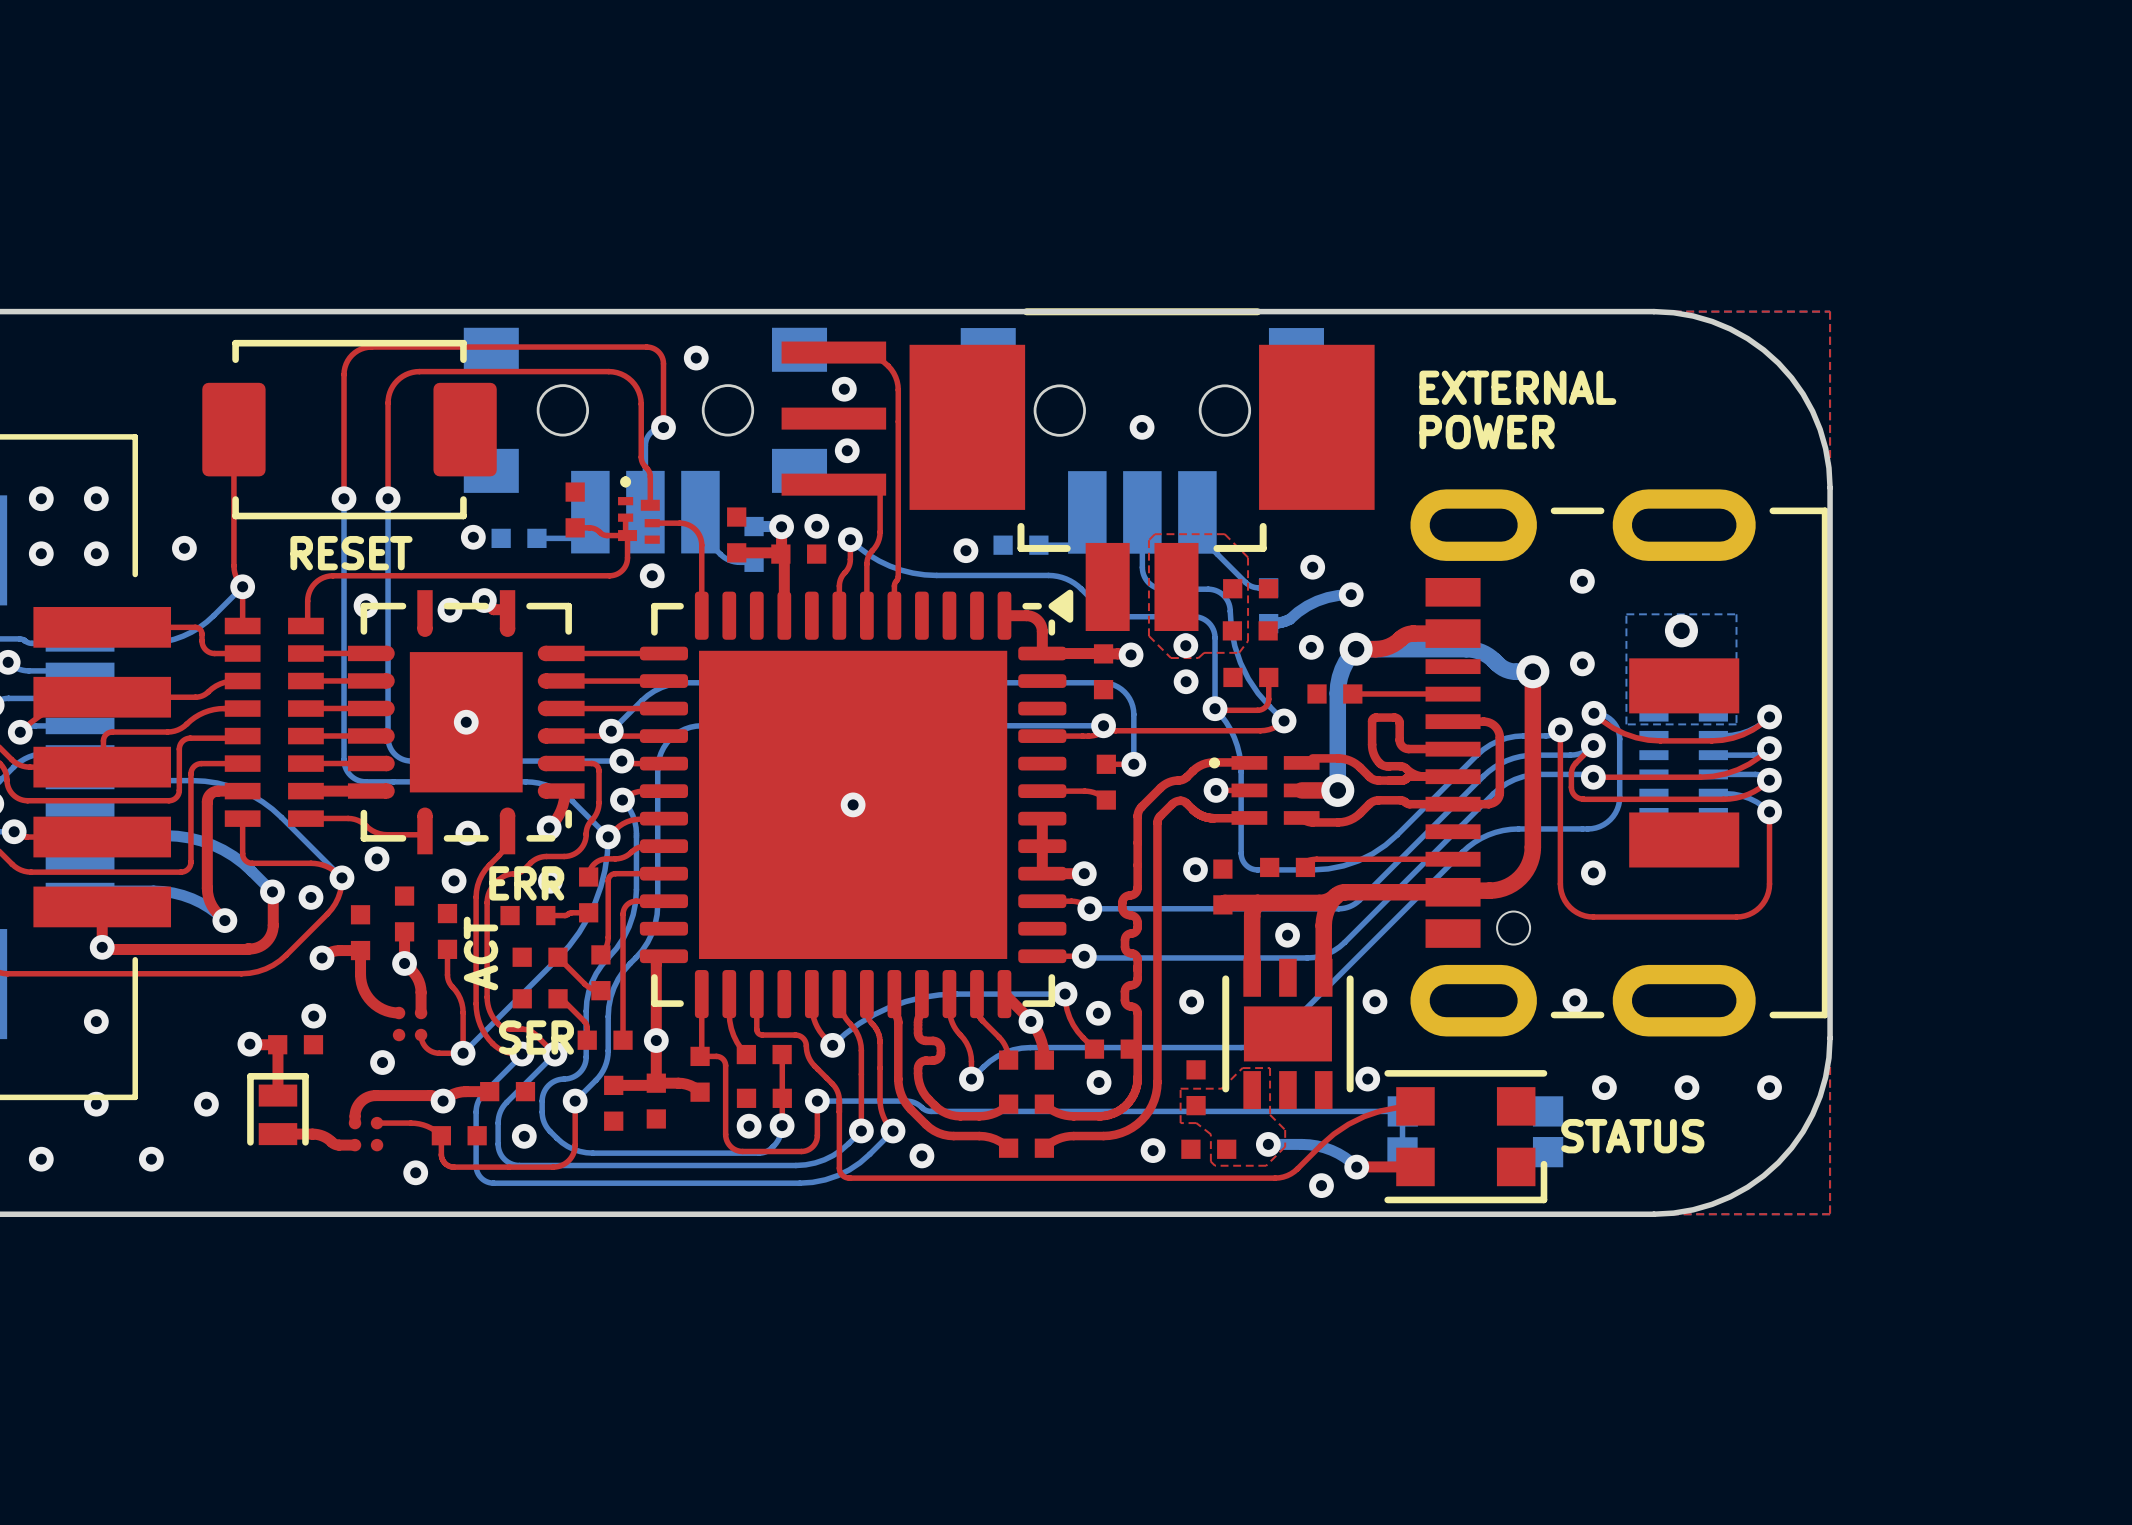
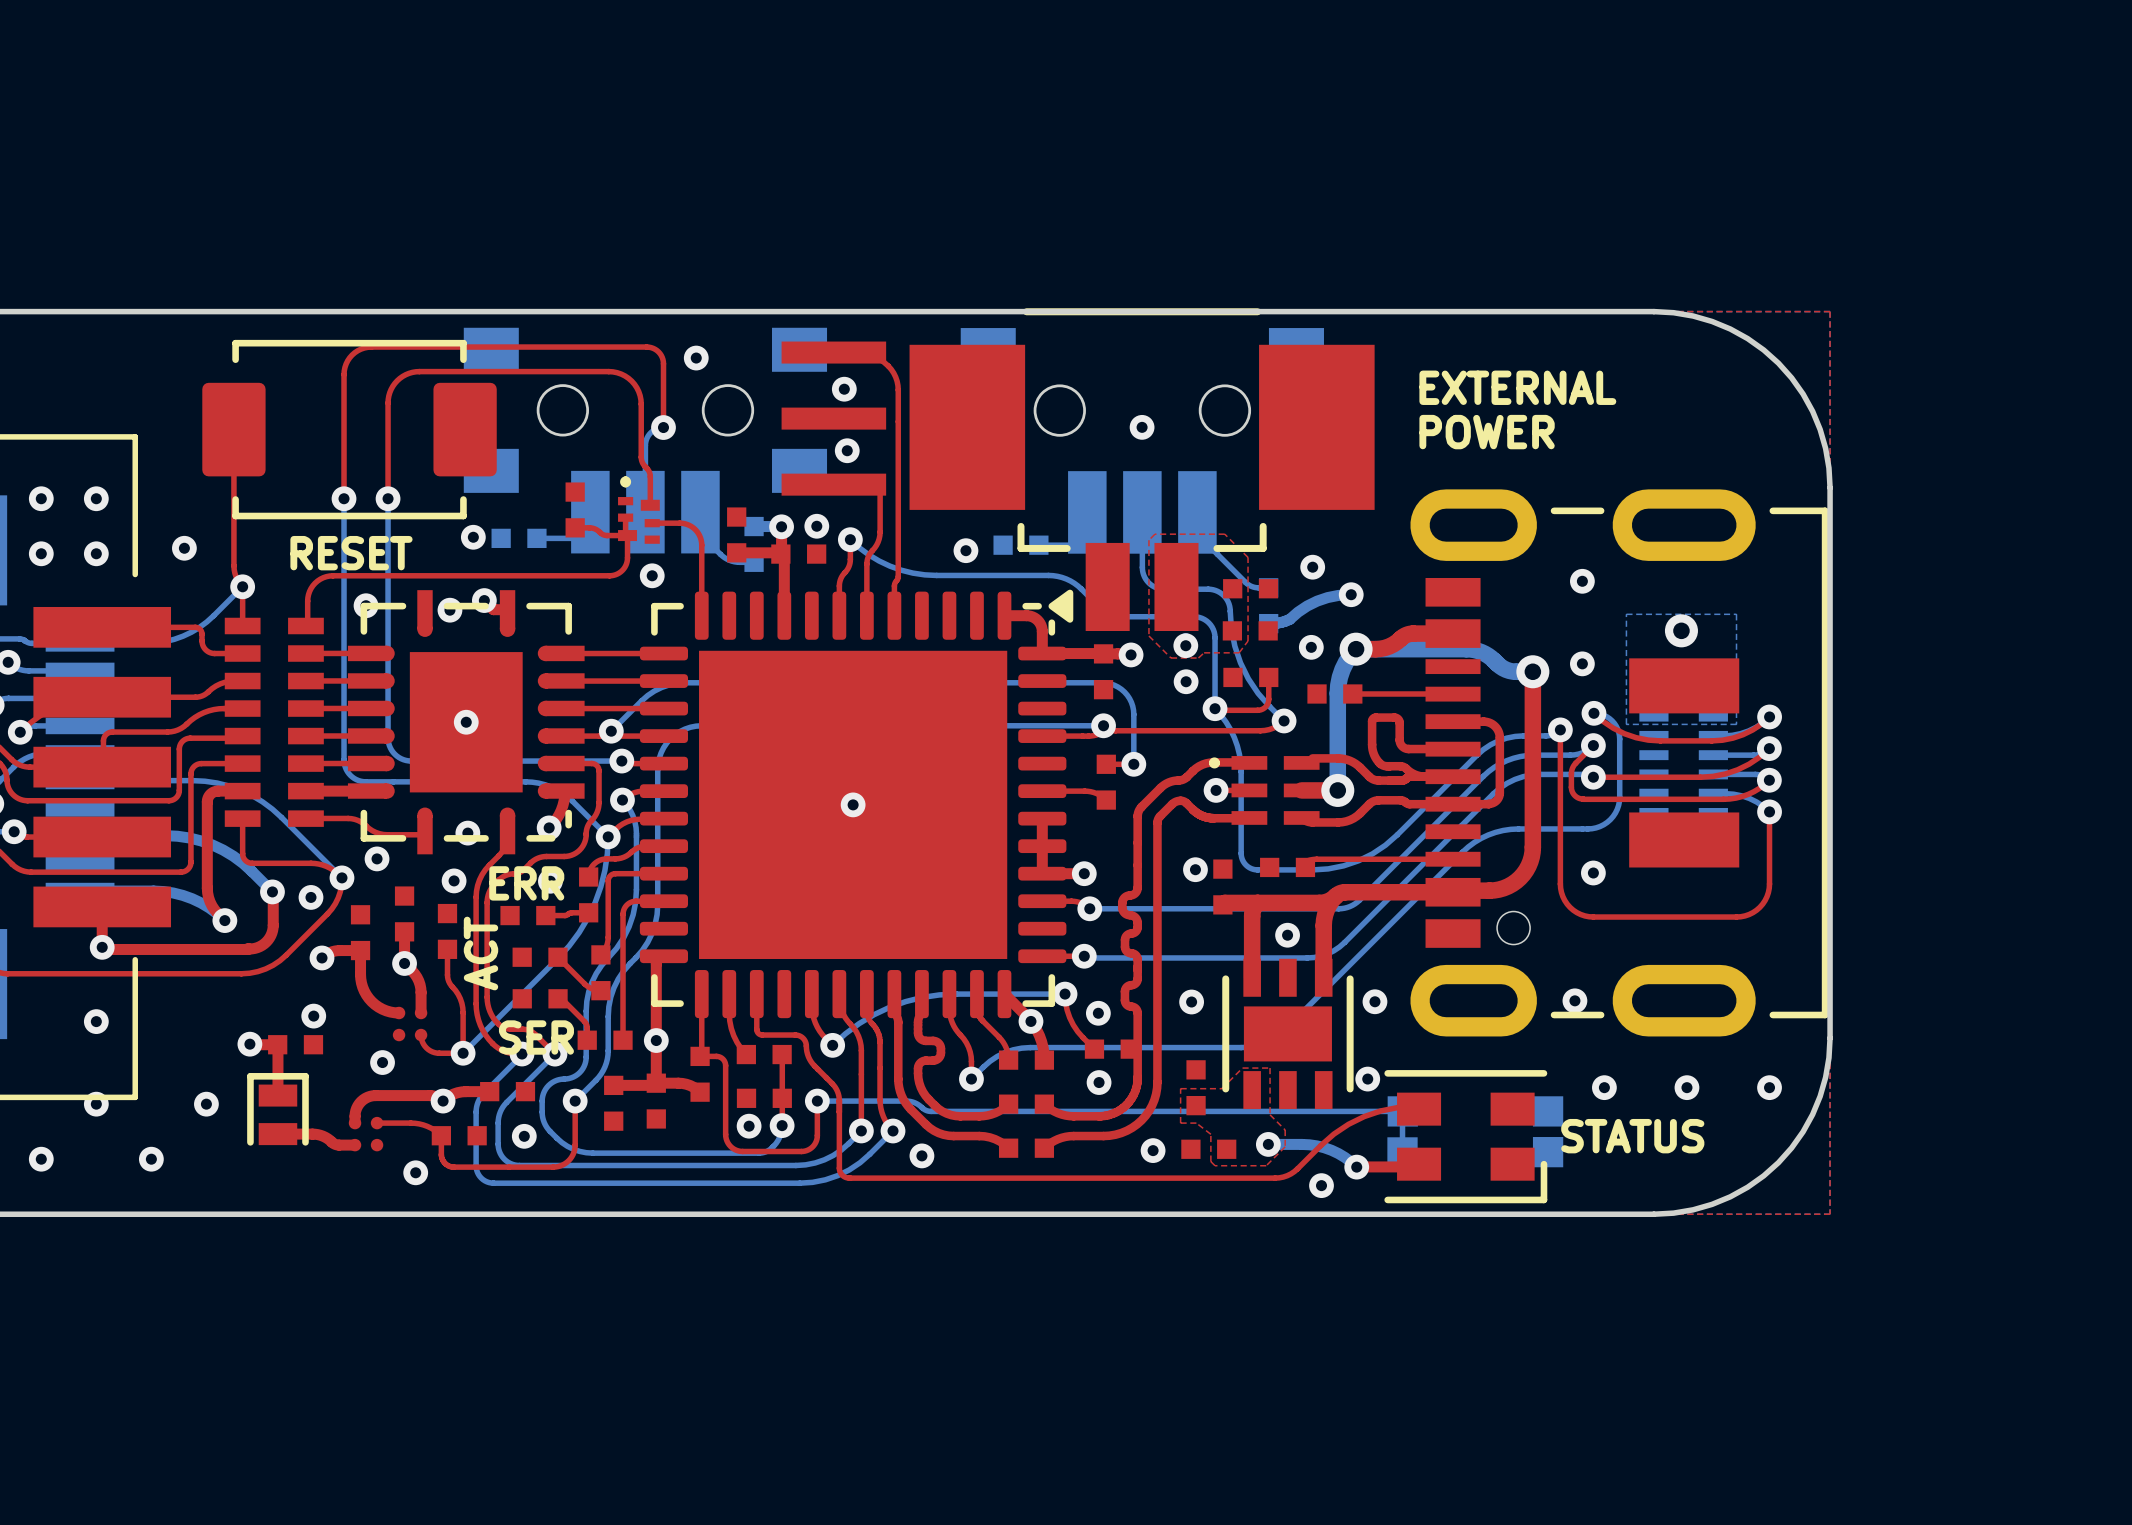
part footprint: [1384, 1070, 1548, 1204] -> [1384, 1070, 1548, 1204]

